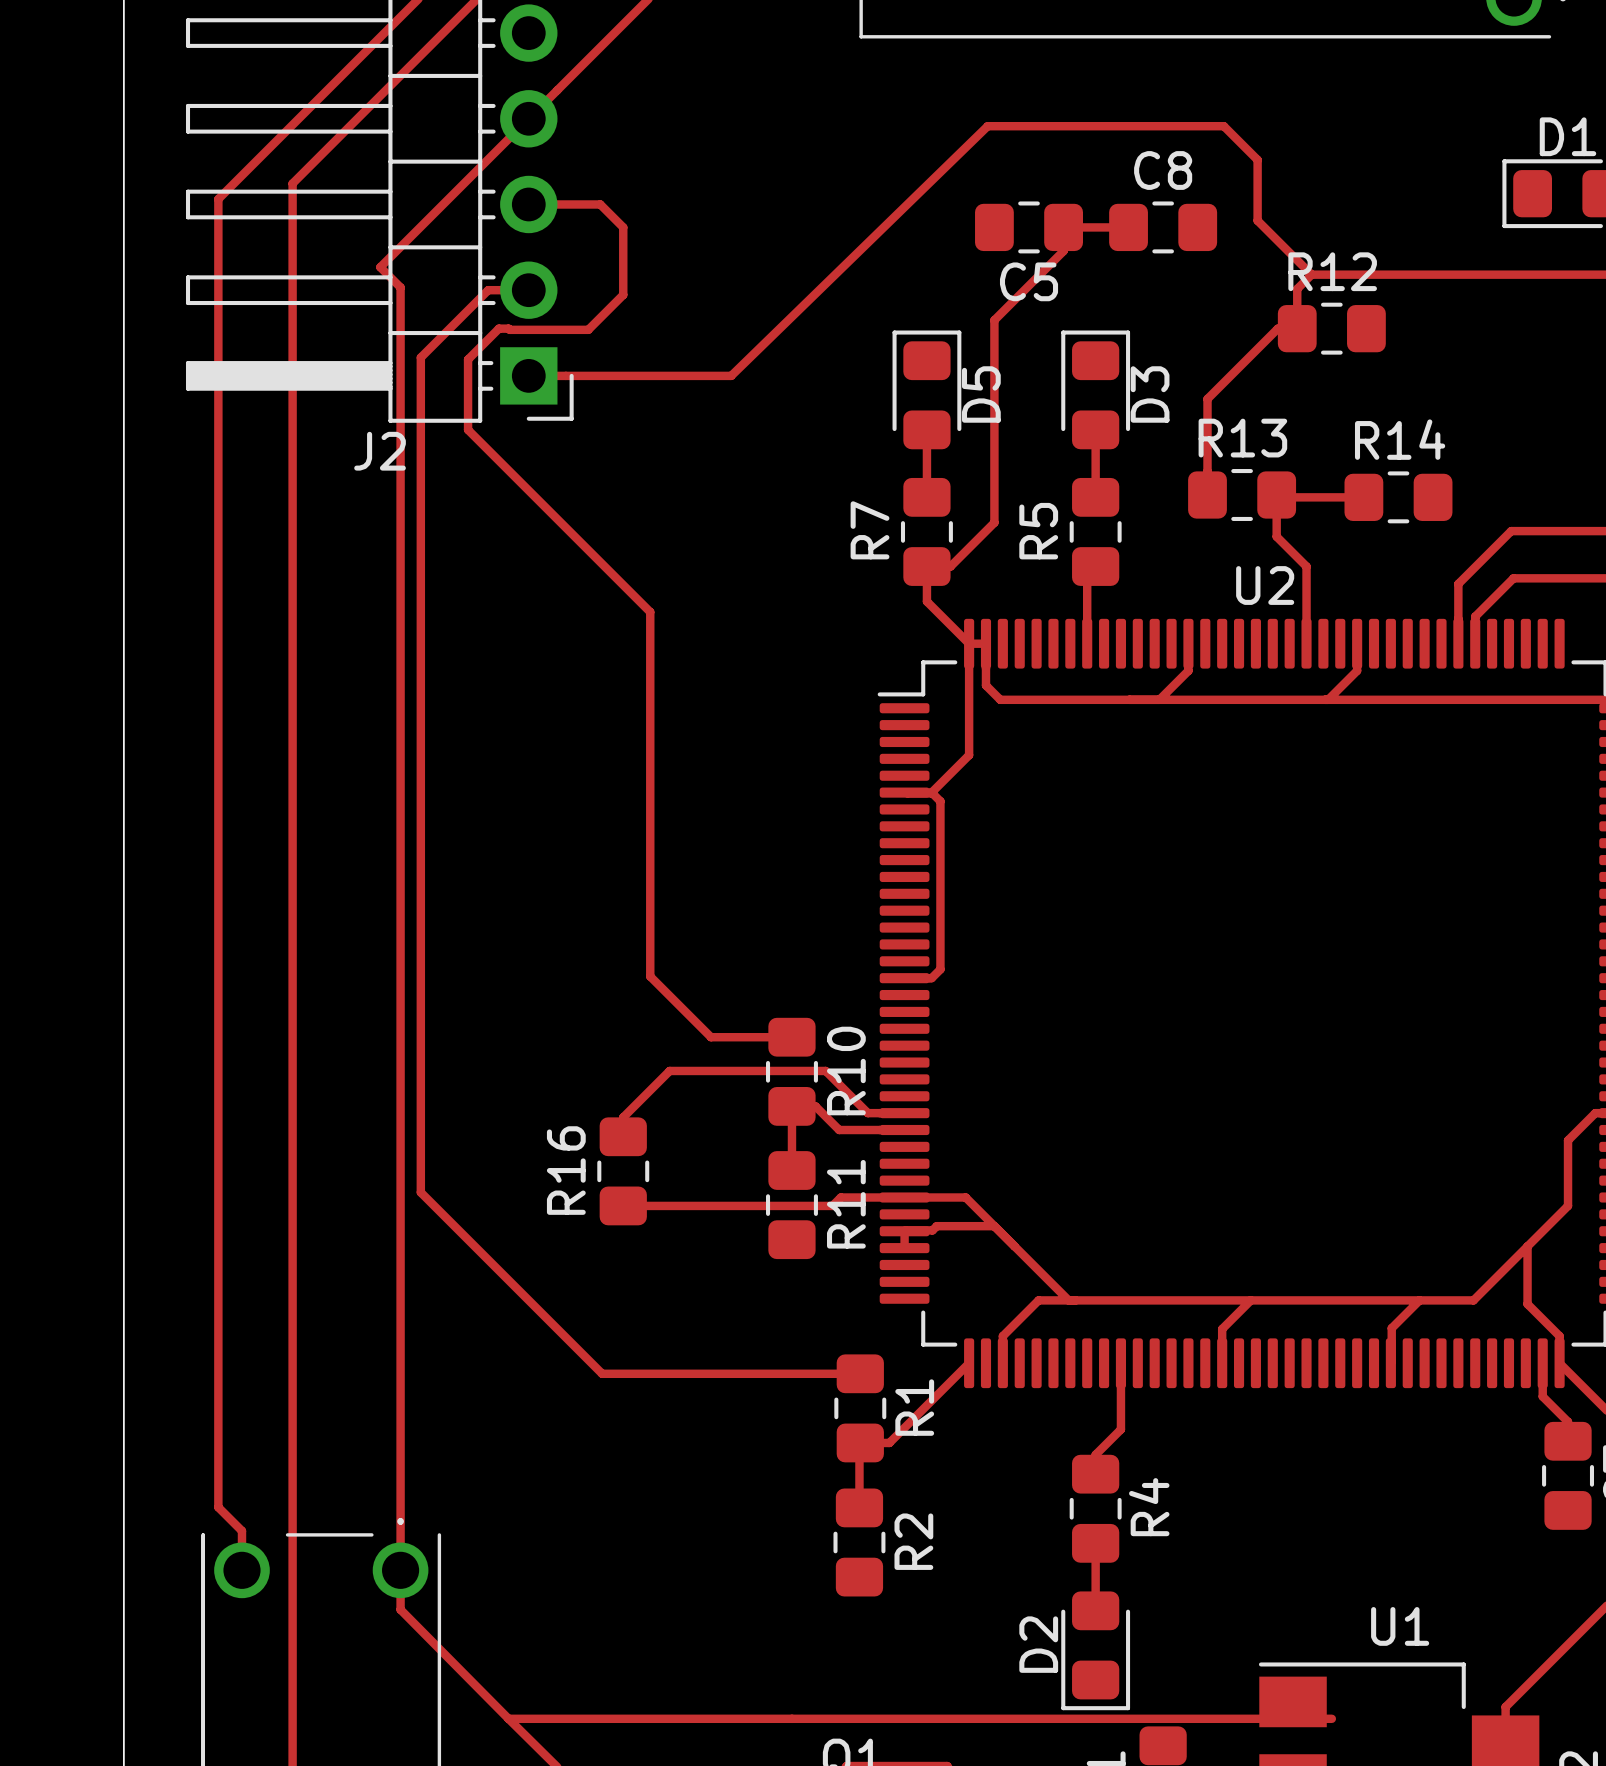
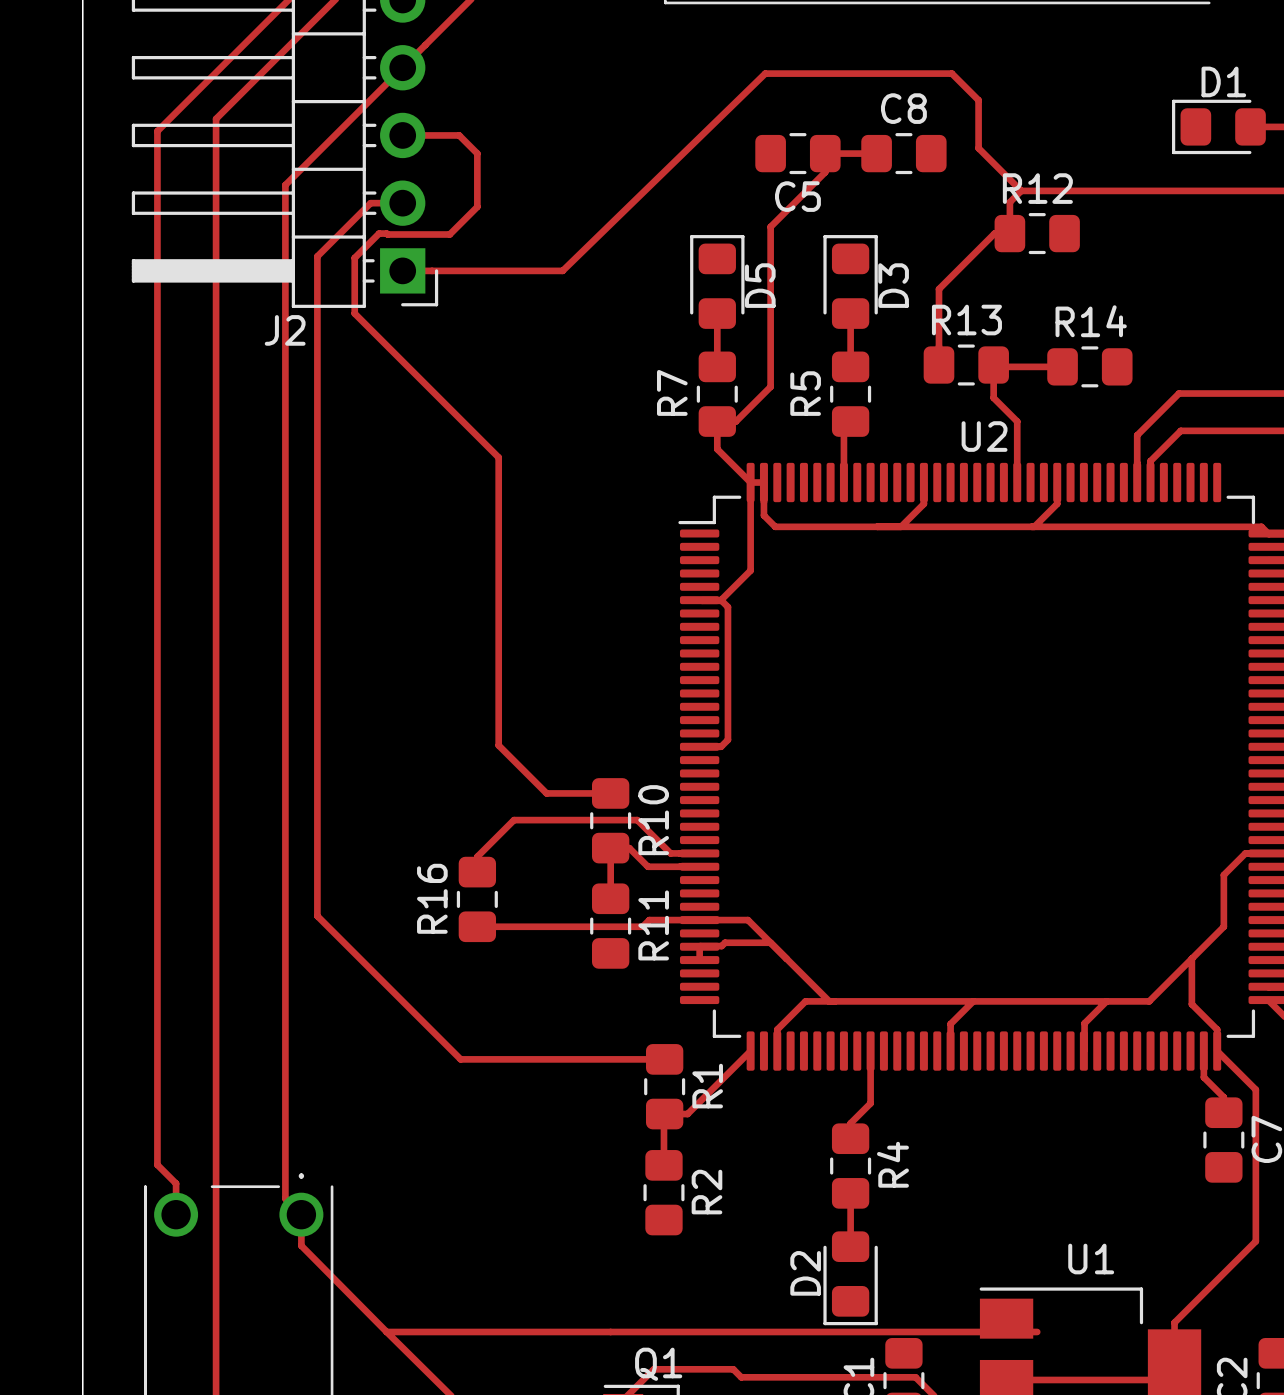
track: (380, 267) (400, 287) (400, 1570) -> (285, 185) (285, 1198) (301, 1214)

